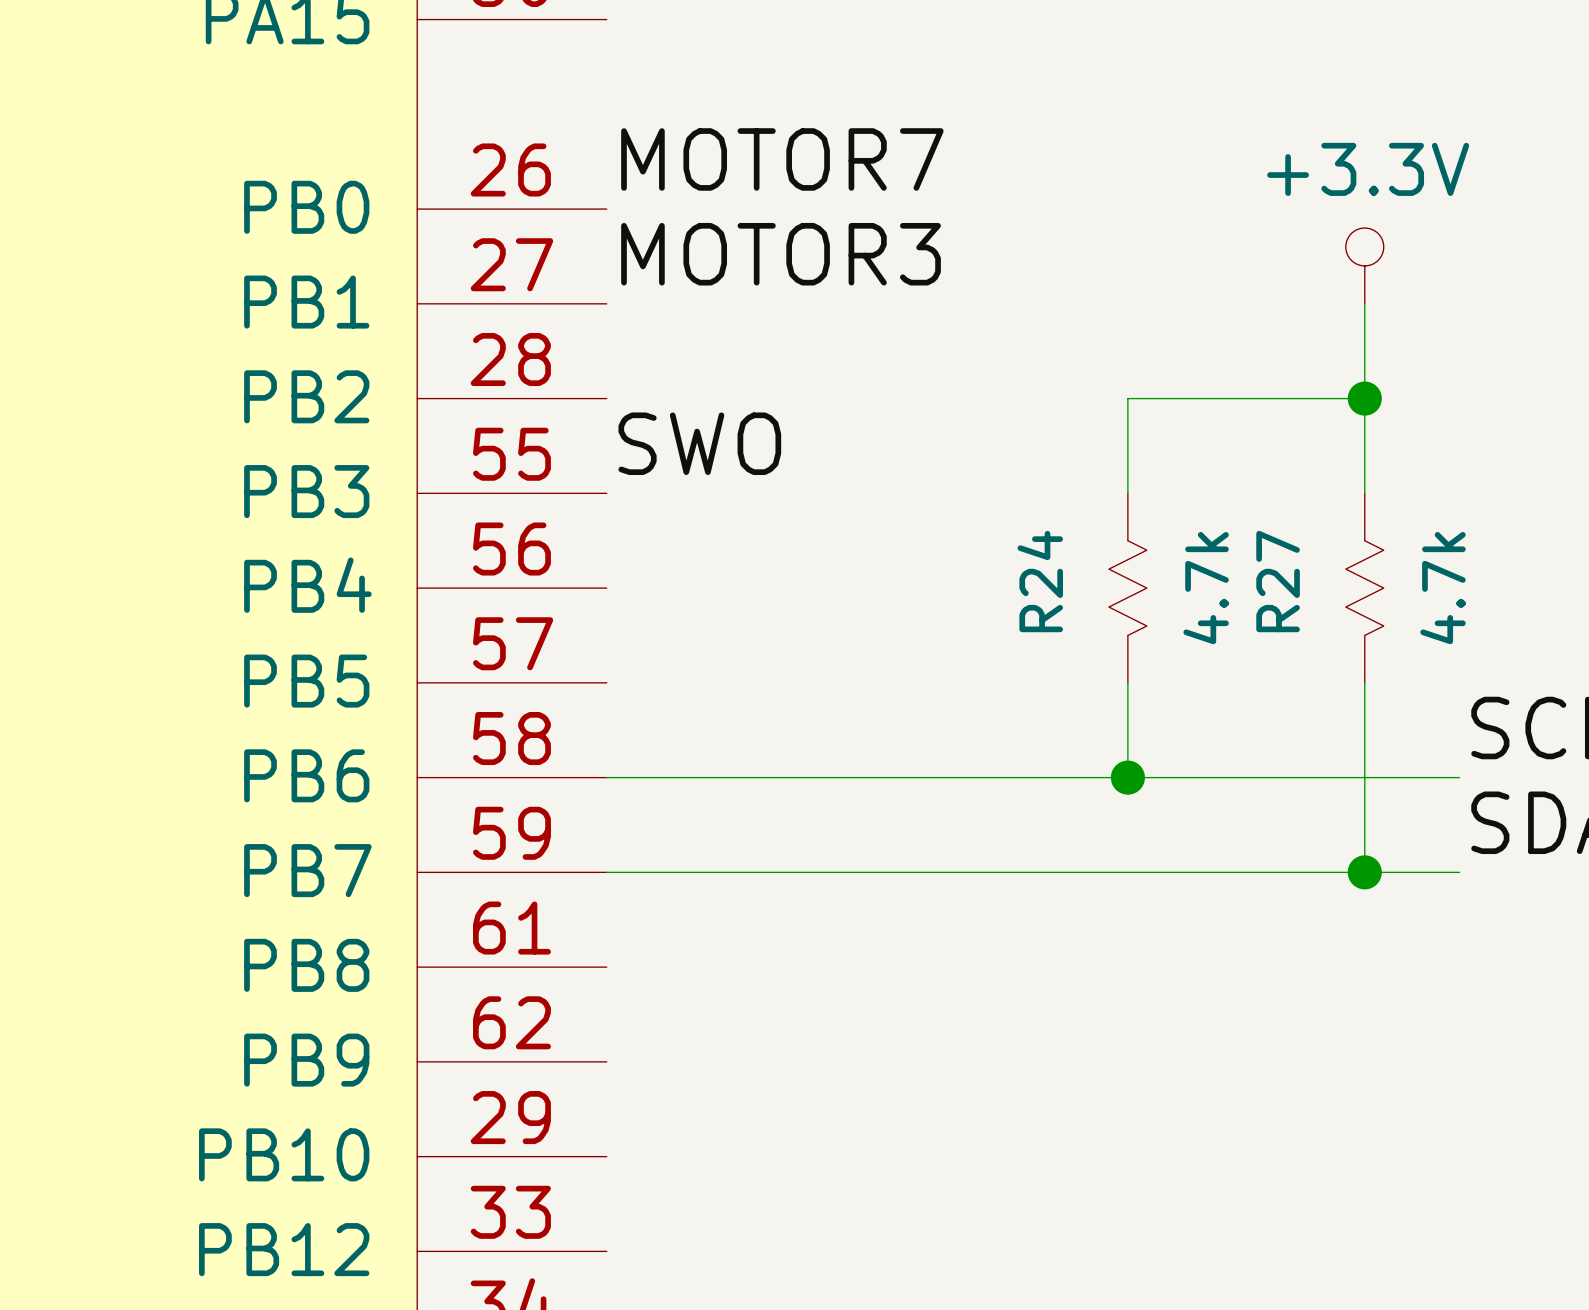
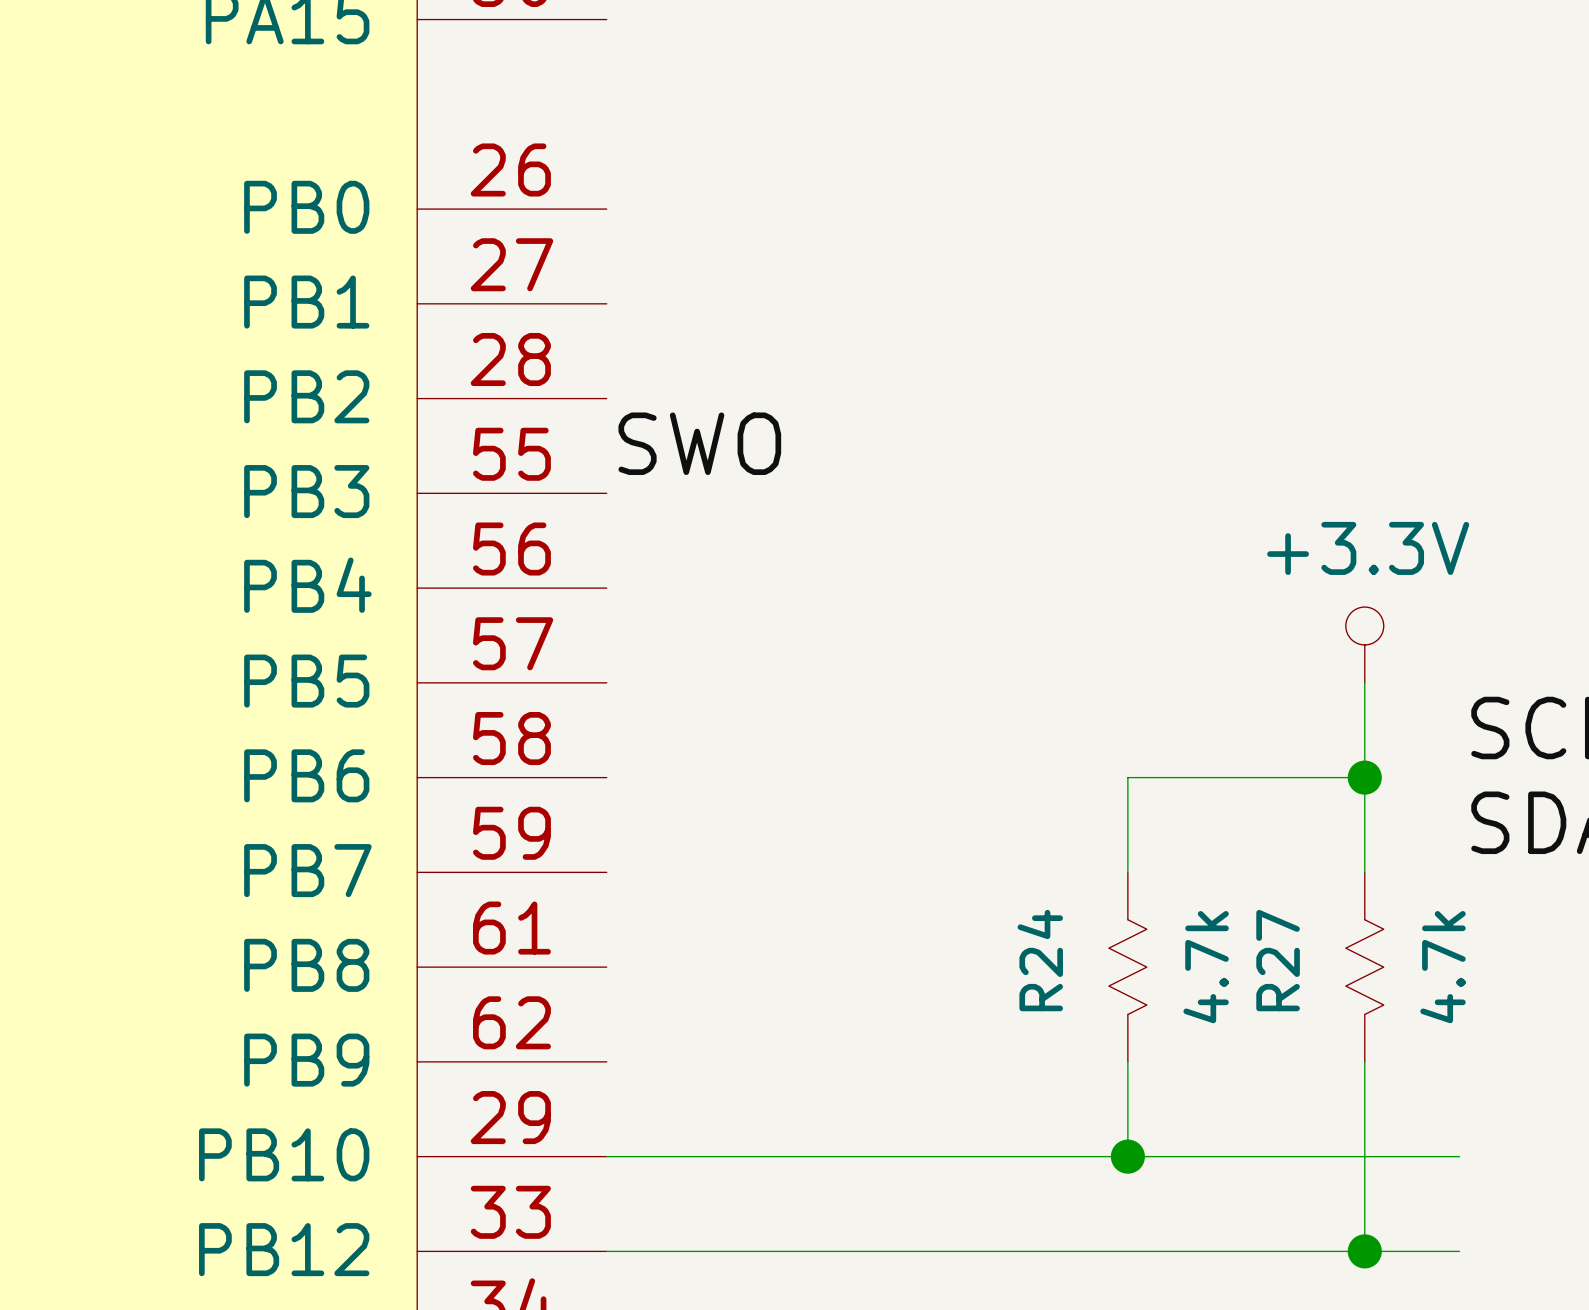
label: MOTOR7 (782, 159) -> none
label: MOTOR3 (781, 254) -> none
power symbol position: +3.3V (1364, 265) -> +3.3V (1364, 644)
wire: (1364, 303) (1364, 493) -> (1364, 1061) (1364, 1251)
wire: (1364, 398) (1127, 398) (1127, 493) -> none
junction: (1364, 398) -> none
R24 position: (1127, 588) -> (1127, 967)
R27 position: (1364, 588) -> (1364, 967)
wire: (1127, 682) (1127, 777) (606, 777) -> none
wire: none -> (1127, 777) (1127, 872)
junction: (1127, 777) -> none
wire: (1364, 777) (1459, 777) -> none
wire: (606, 872) (1459, 872) -> (606, 1156) (1459, 1156)
junction position: (1364, 872) -> (1364, 777)
wire: none -> (1127, 1061) (1127, 1156)
junction: none -> (1127, 1156)
wire: none -> (606, 1251) (1459, 1251)
junction: none -> (1364, 1251)

